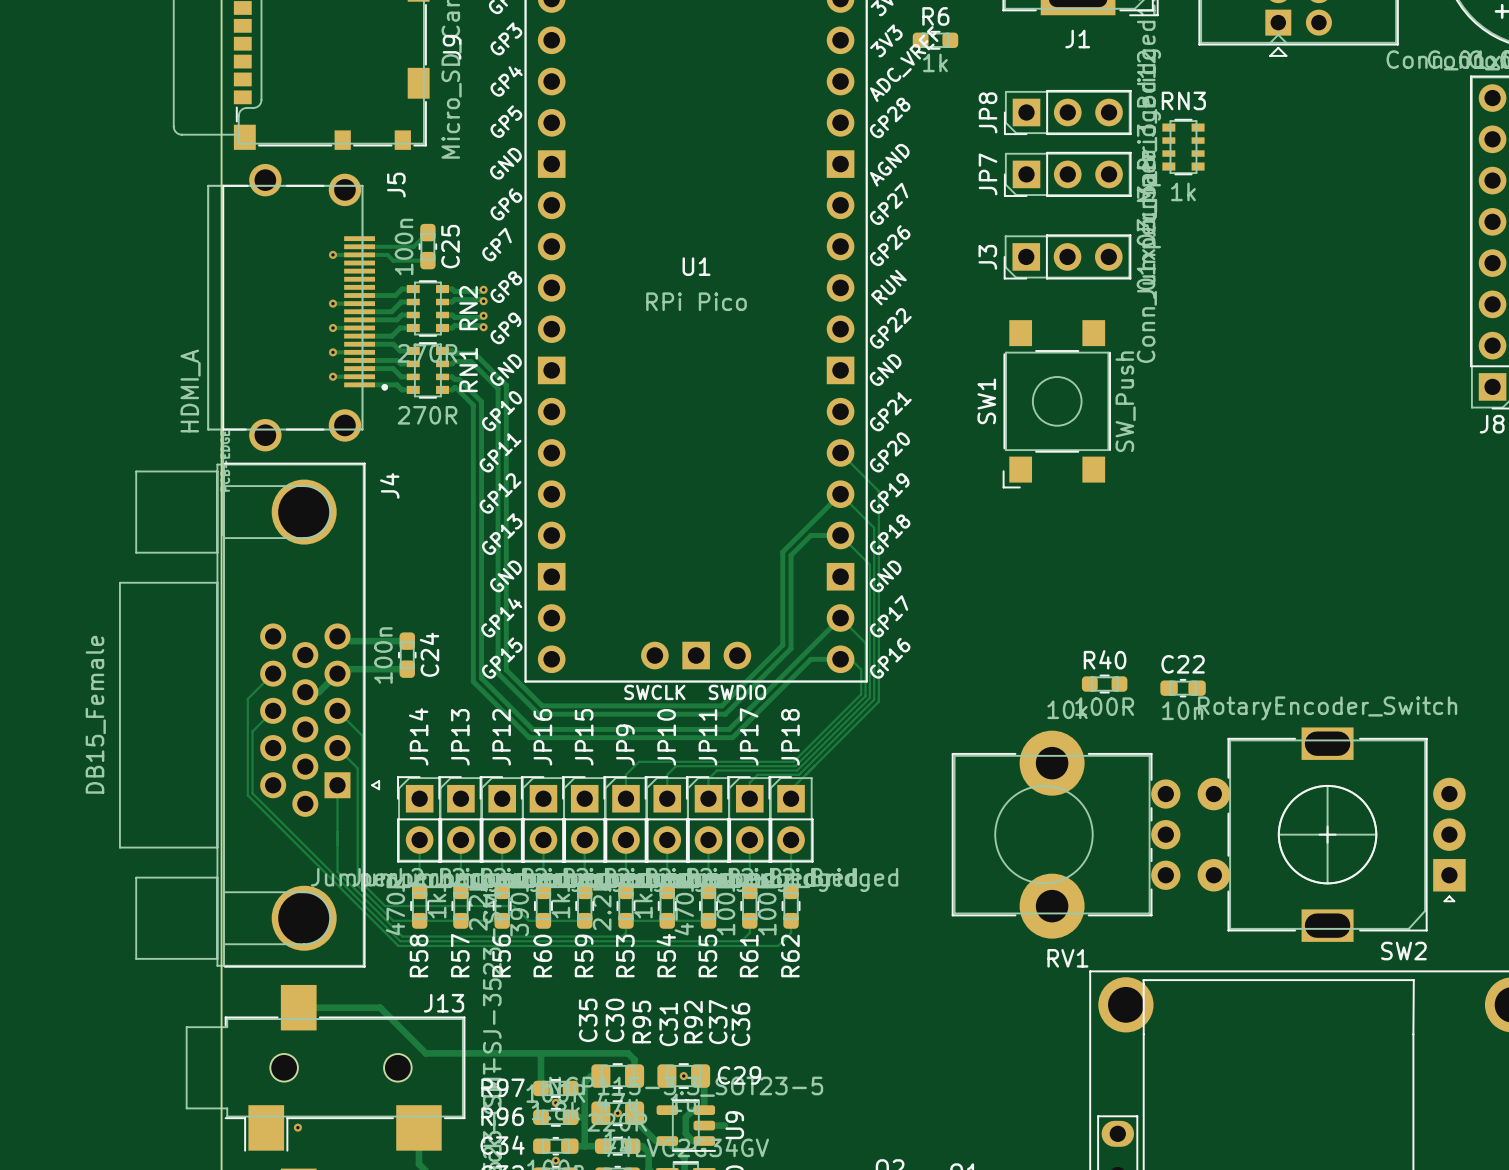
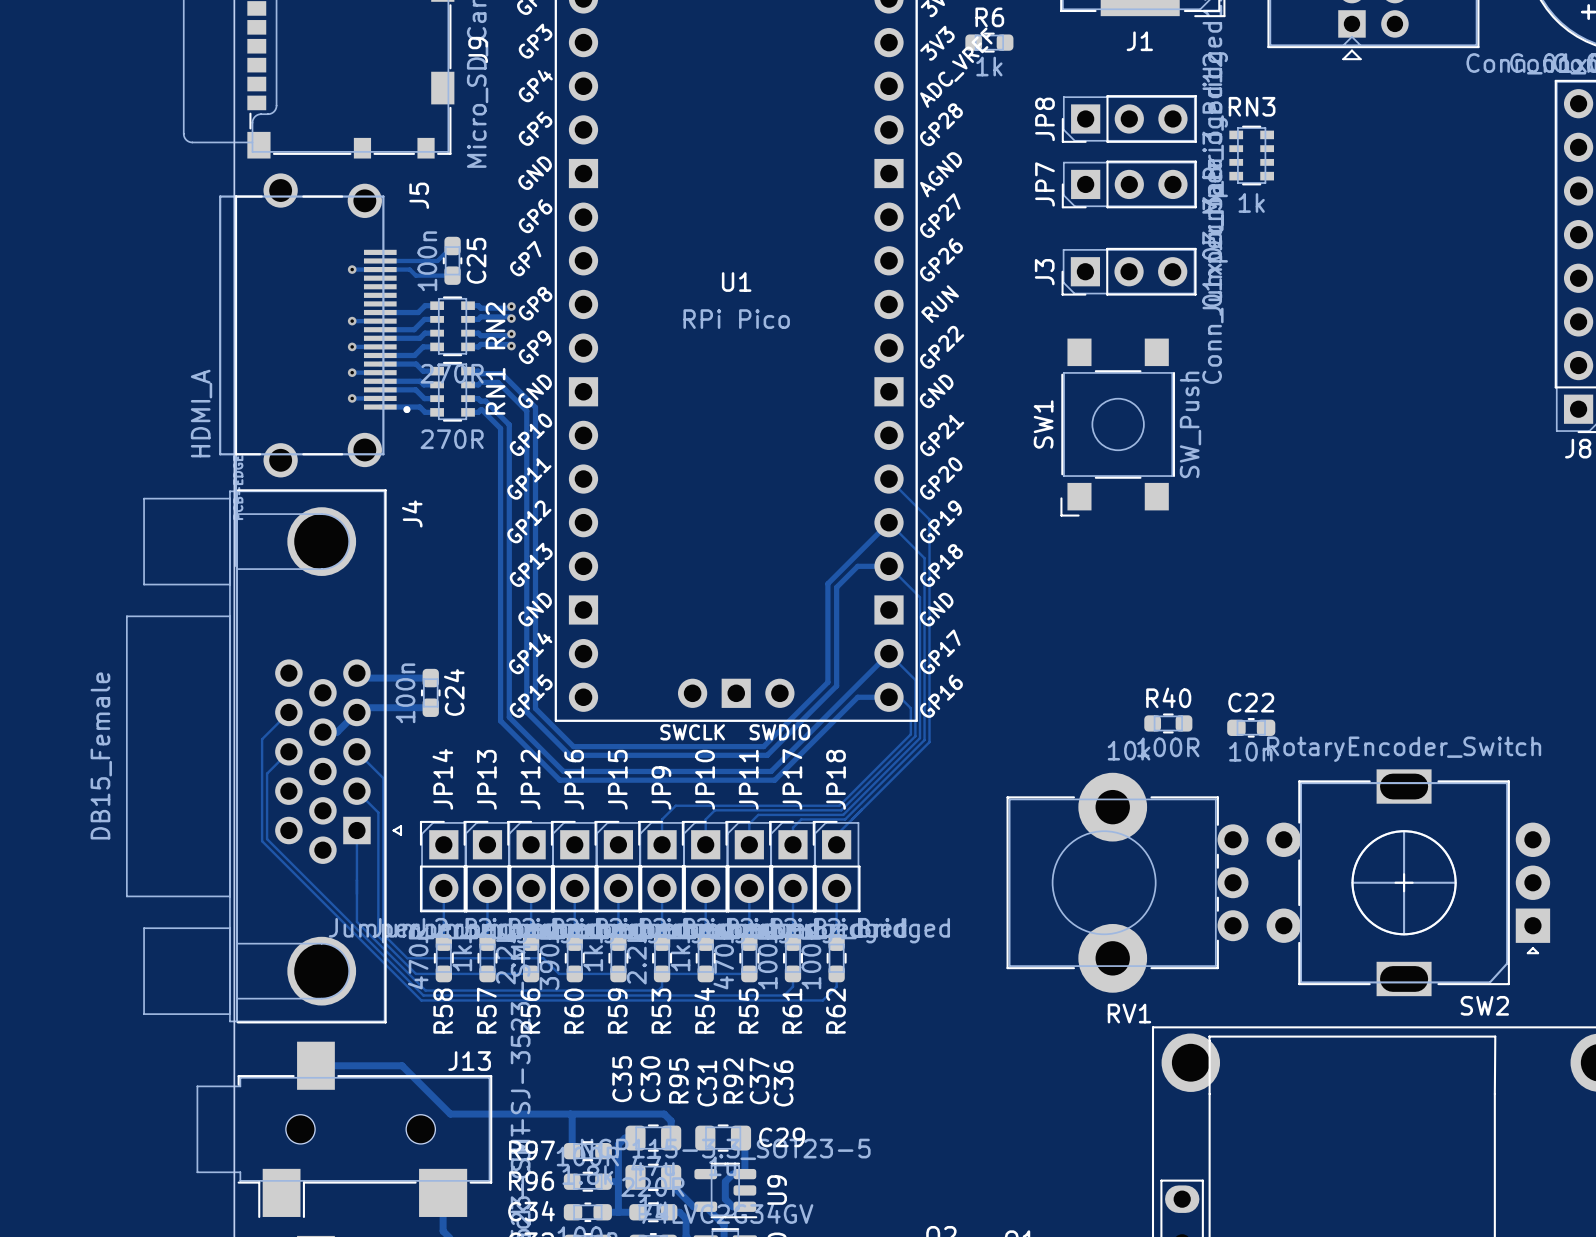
via: (683, 1076) -> none
via: (555, 1102) -> none
via: (617, 1113) -> none
track: (704, 1125) (725, 1125) -> none
via: (297, 1127) -> none
via: (555, 1160) -> none

